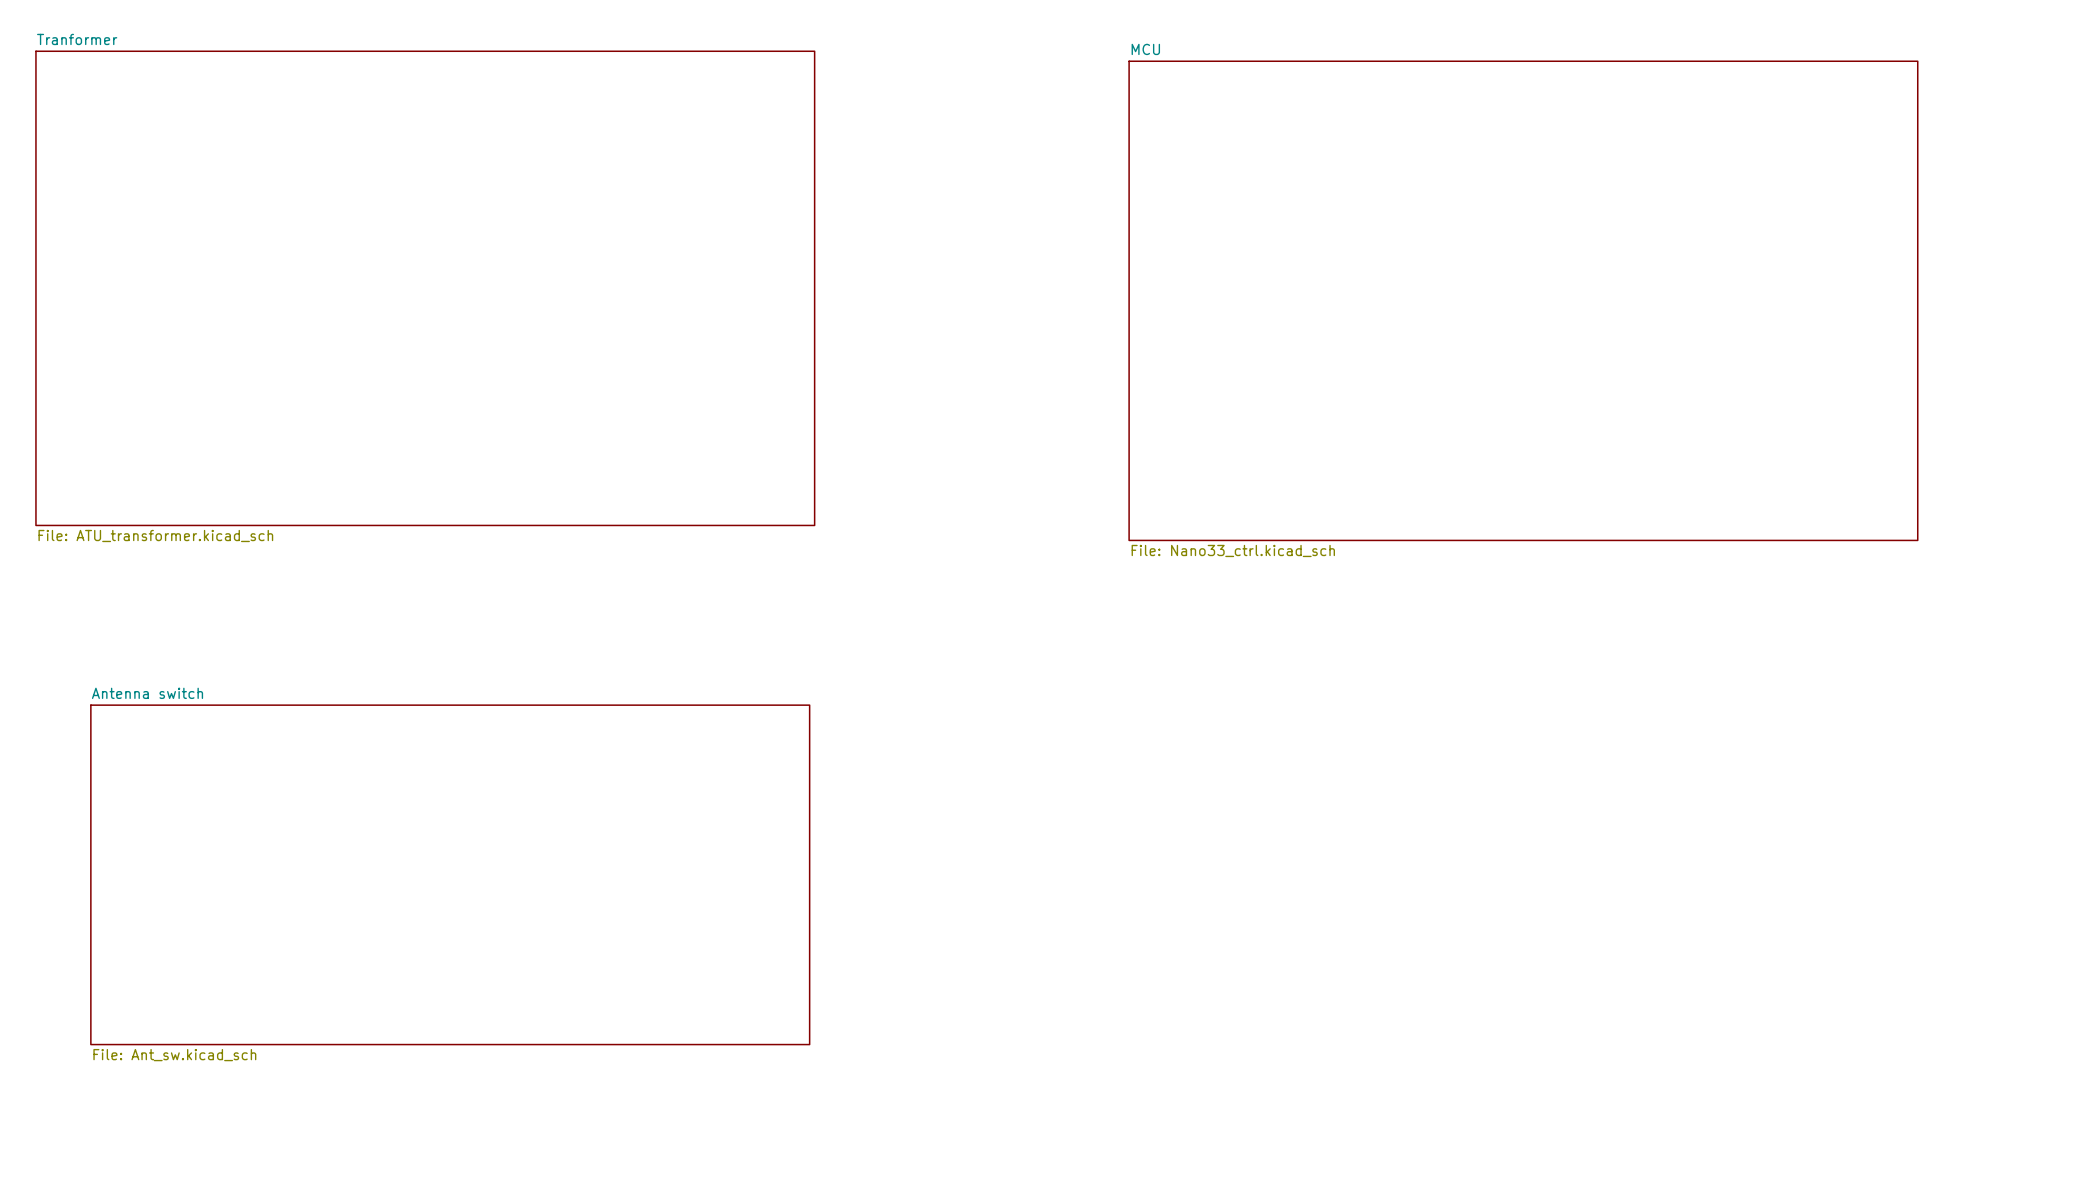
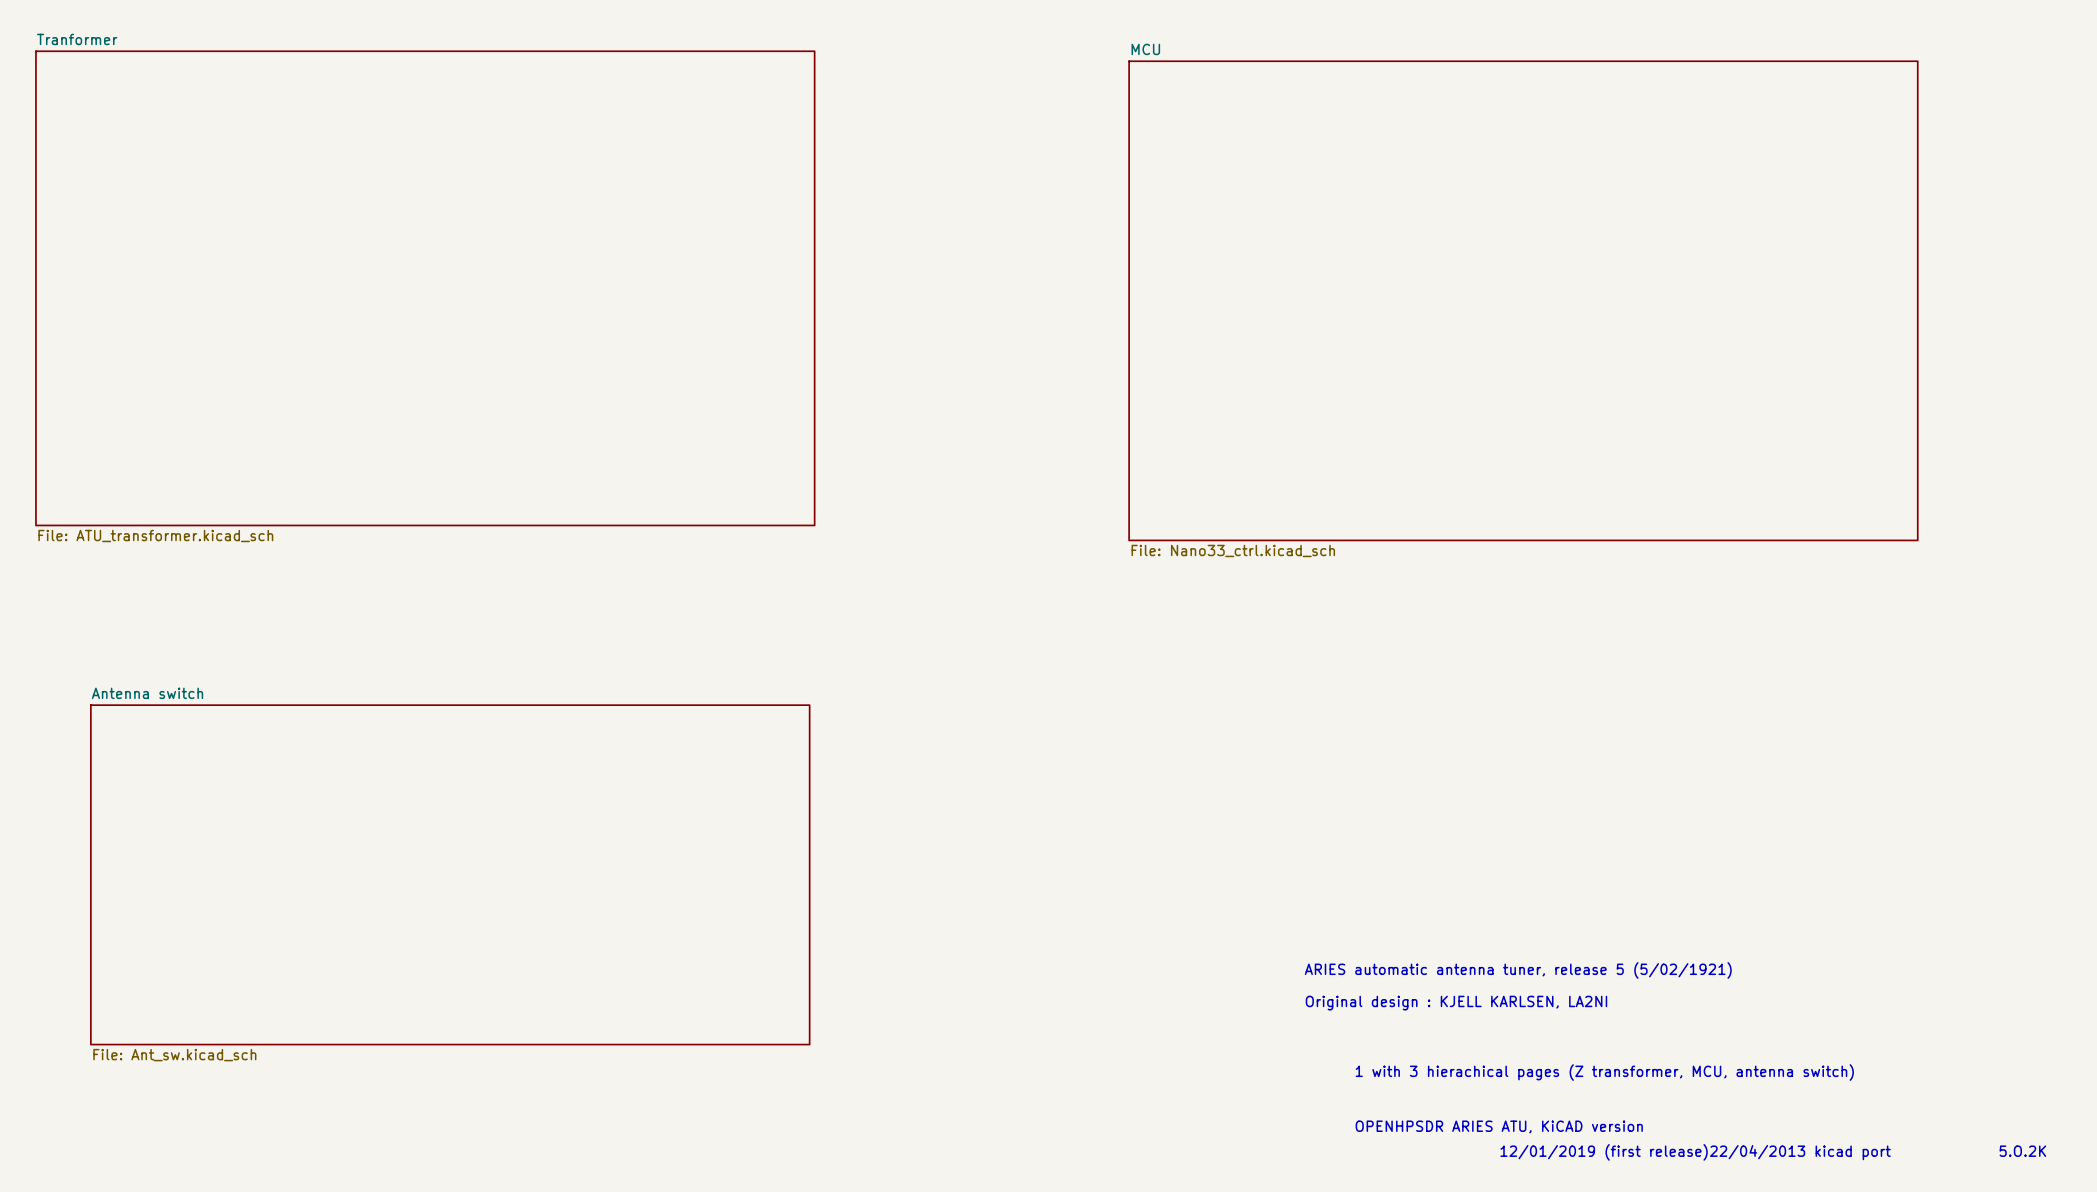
text: none -> ARIES automatic antenna tuner, release 5 (5/02/1921) (1518, 970)
text: none -> Original design : KJELL KARLSEN, LA2NI (1456, 1003)
text: none -> 1 with 3 hierachical pages (Z transformer, MCU, antenna switch) (1604, 1072)
text: none -> OPENHPSDR ARIES ATU, KiCAD version (1499, 1126)
text: none -> 5.O.2K (2022, 1151)
text: none -> 12/01/2019 (first release)22/04/2013 kicad port (1695, 1152)

